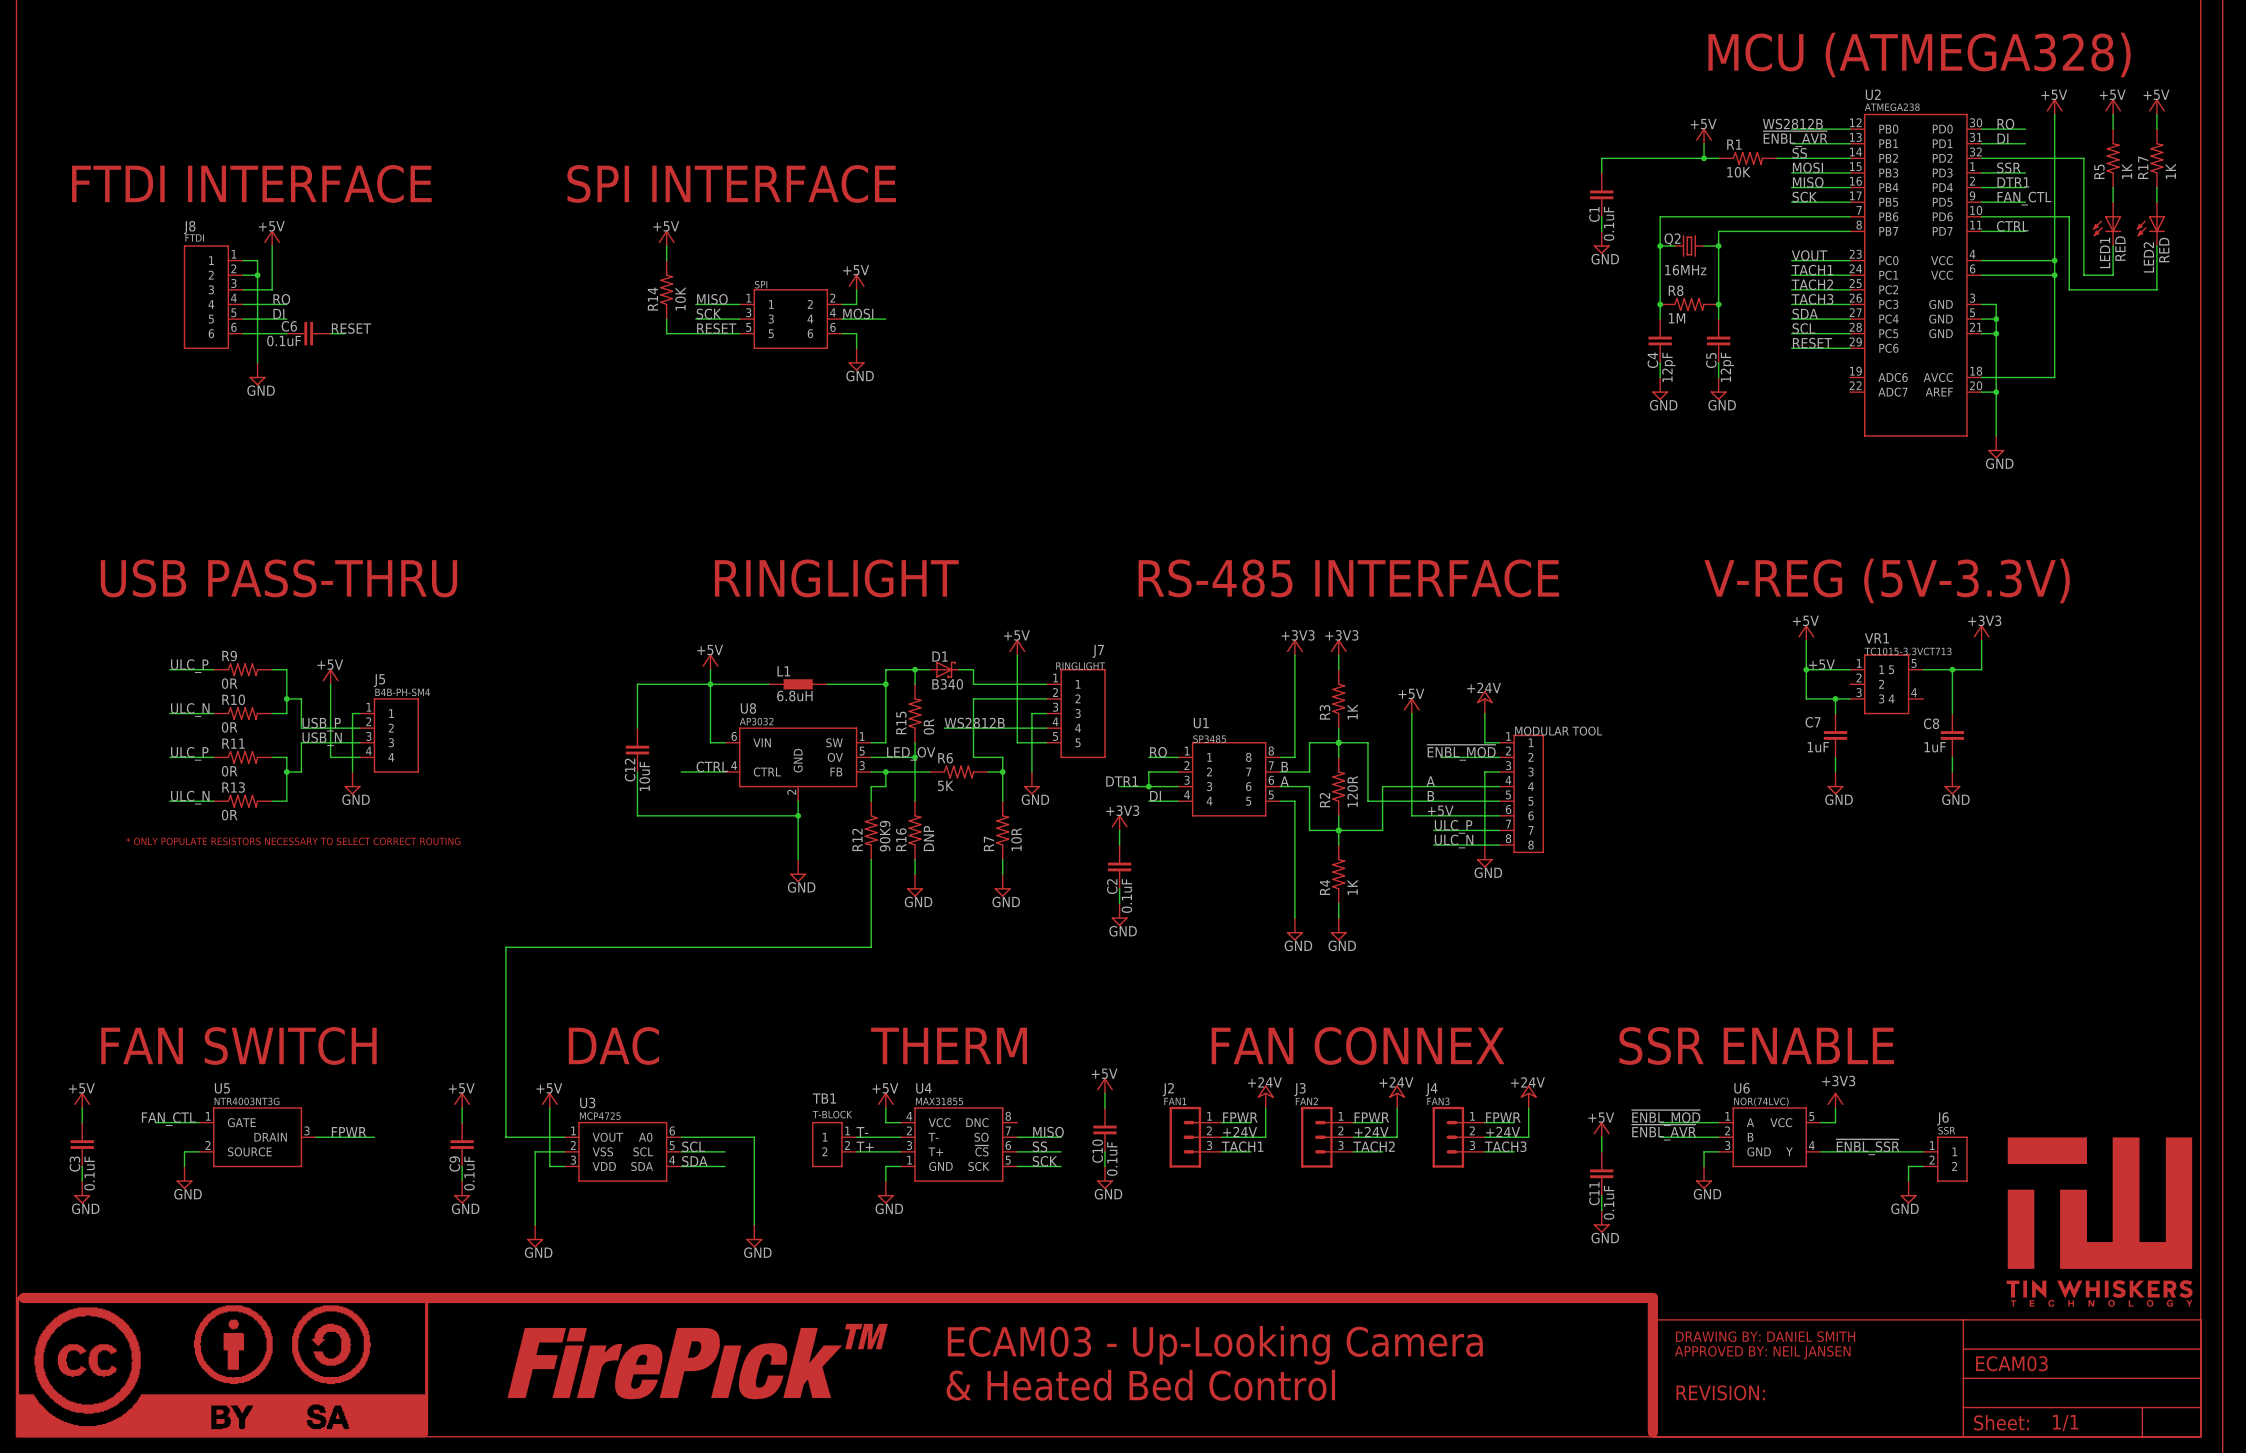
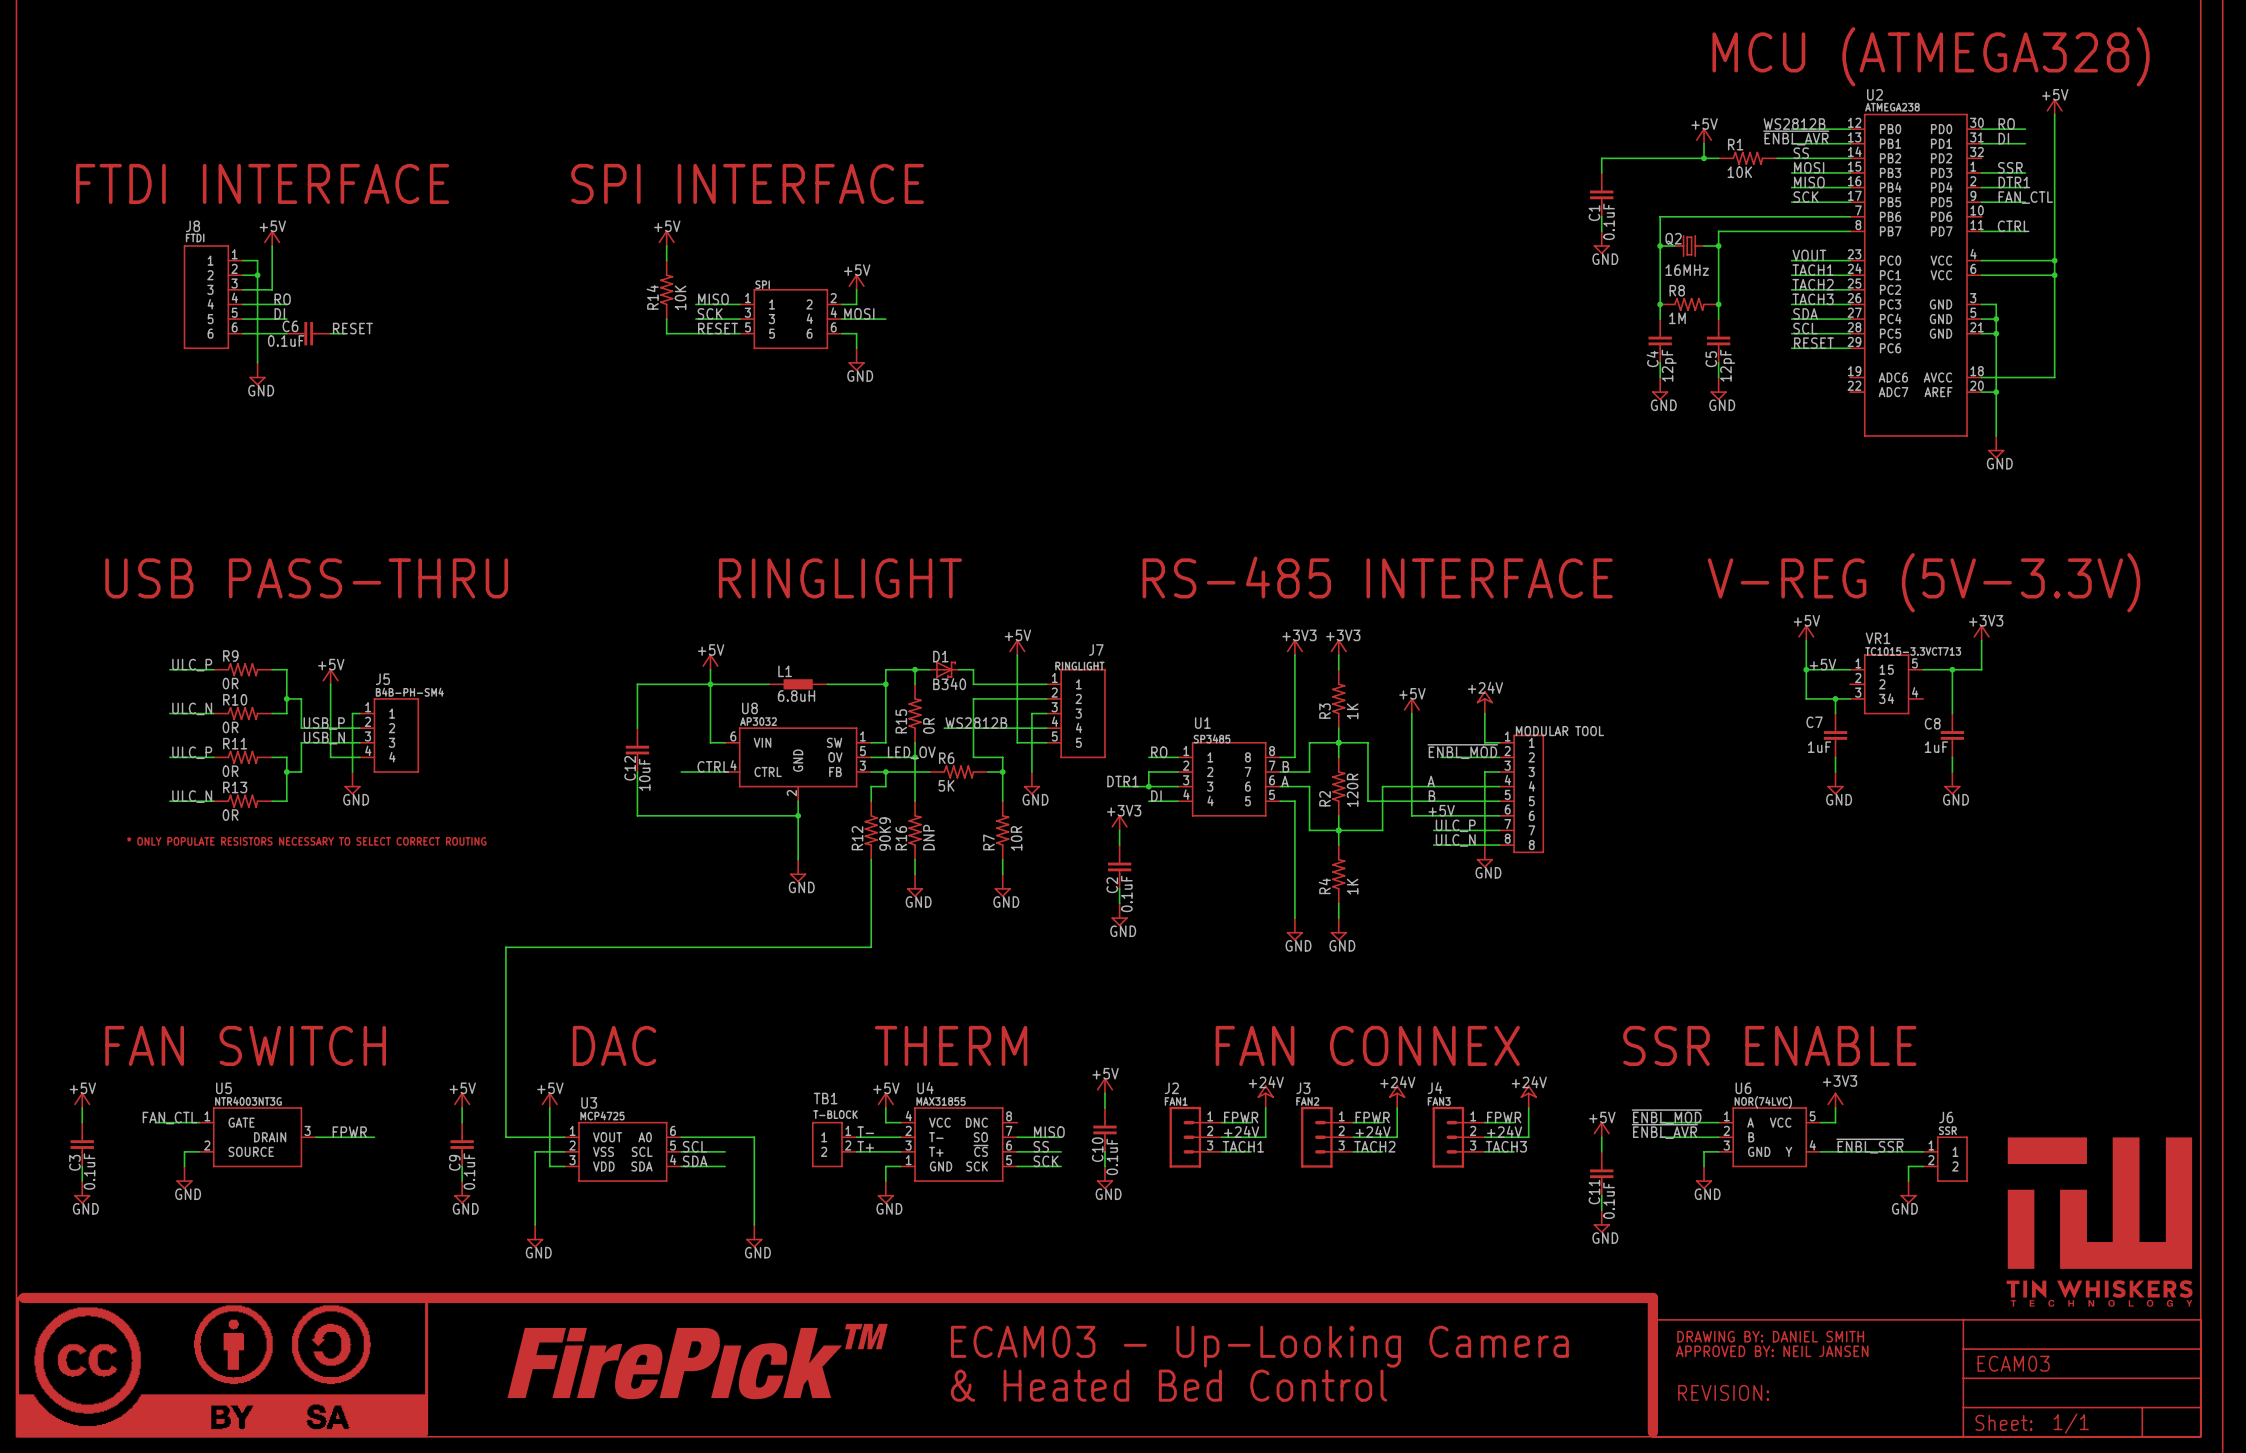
power symbol: +5V (2113, 106) -> none
power symbol: +5V (2156, 106) -> none
wire: (2113, 114) (2113, 129) -> none
wire: (2156, 114) (2156, 129) -> none
wire: (1981, 158) (2083, 158) (2083, 275) (2113, 275) (2113, 246) -> none
R5: 1K (2113, 158) -> none
R17: 1K (2156, 158) -> none
wire: (2113, 187) (2113, 202) -> none
wire: (2156, 187) (2156, 202) -> none
wire: (1981, 216) (2069, 216) (2069, 289) (2156, 289) (2156, 246) -> none
LED1: RED (2107, 224) -> none
LED2: RED (2150, 224) -> none

